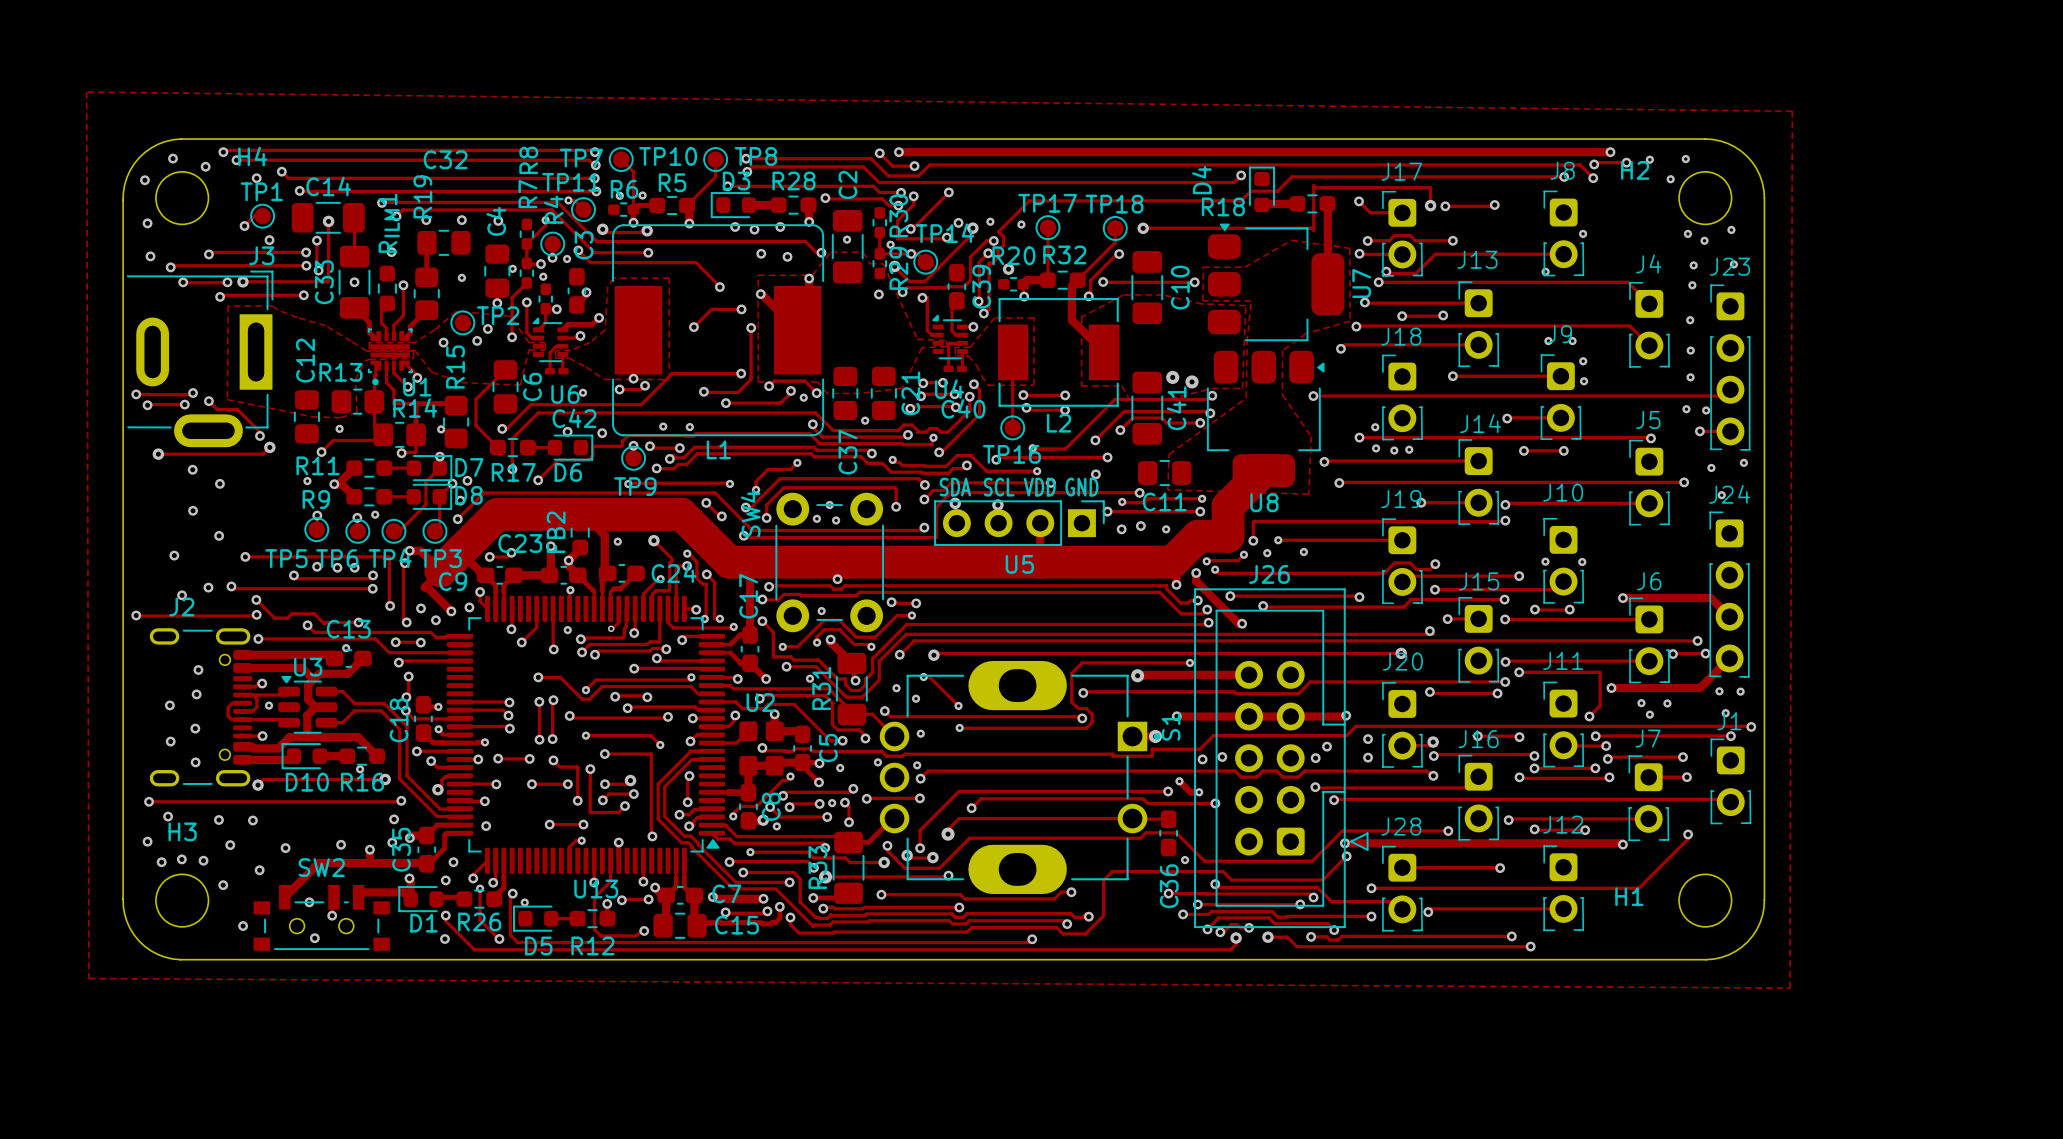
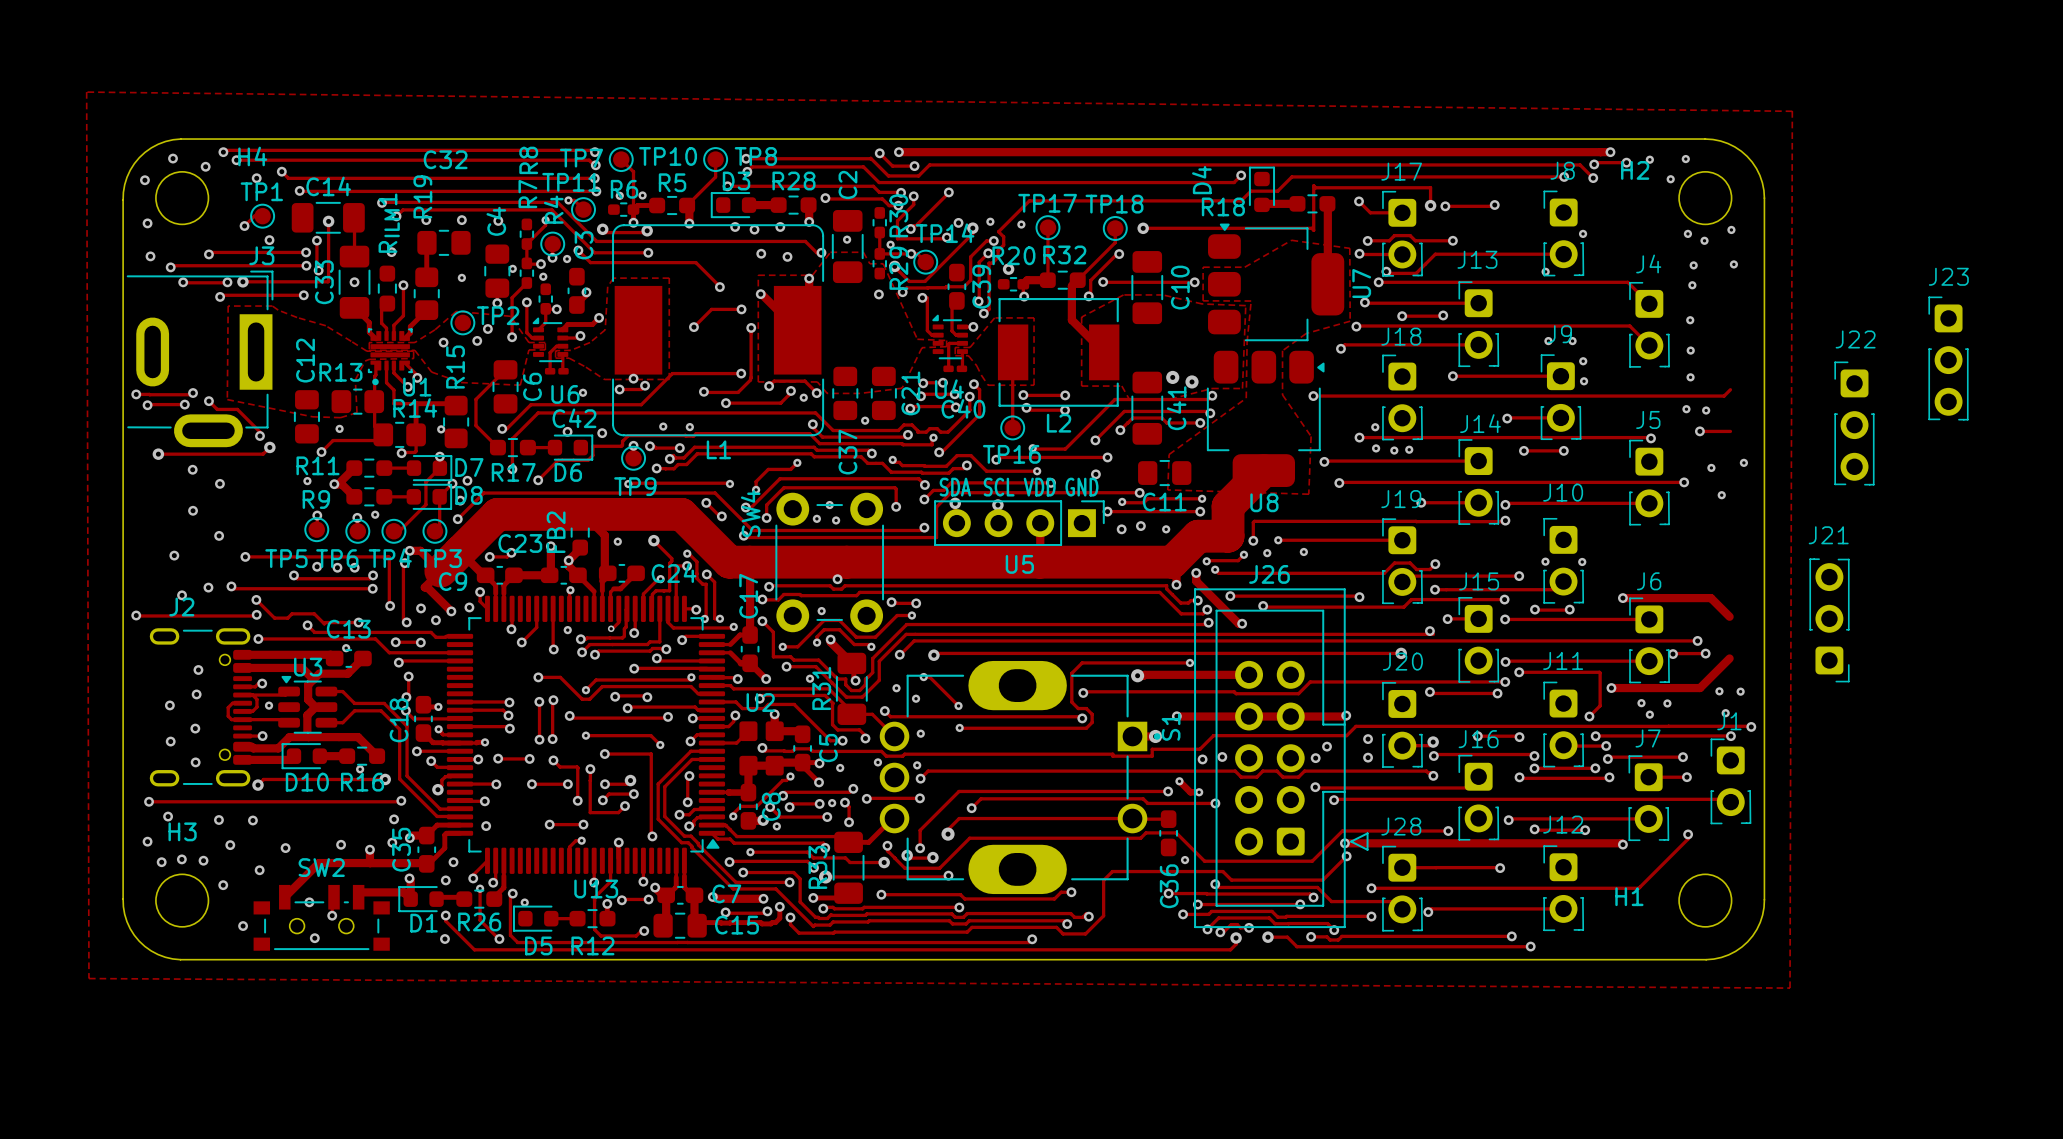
J23 footprint: [1710, 284, 1751, 451] -> [1928, 296, 1969, 421]
J22: none -> (1854, 423)
J24: (1729, 594) -> none
J21: none -> (1829, 620)

